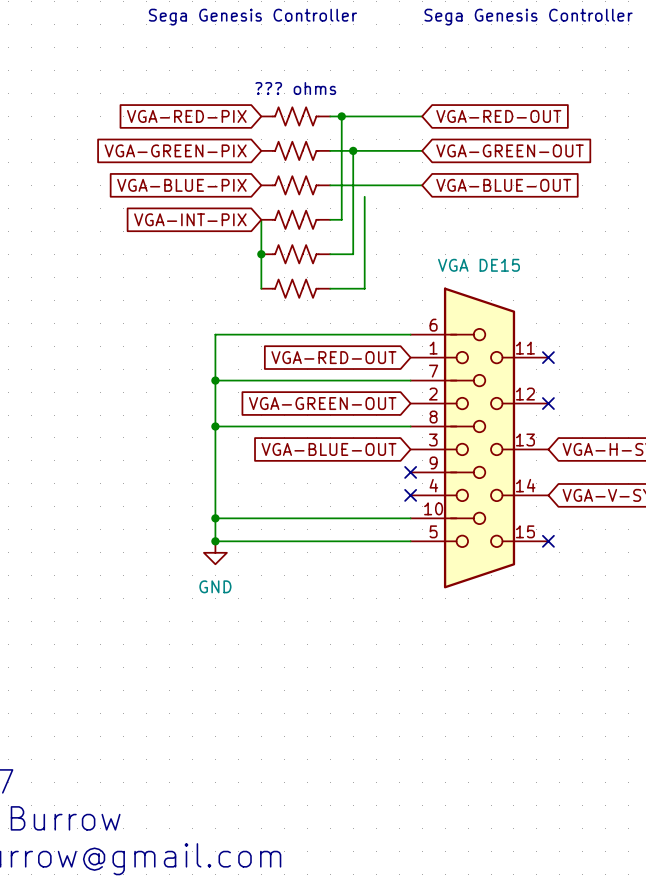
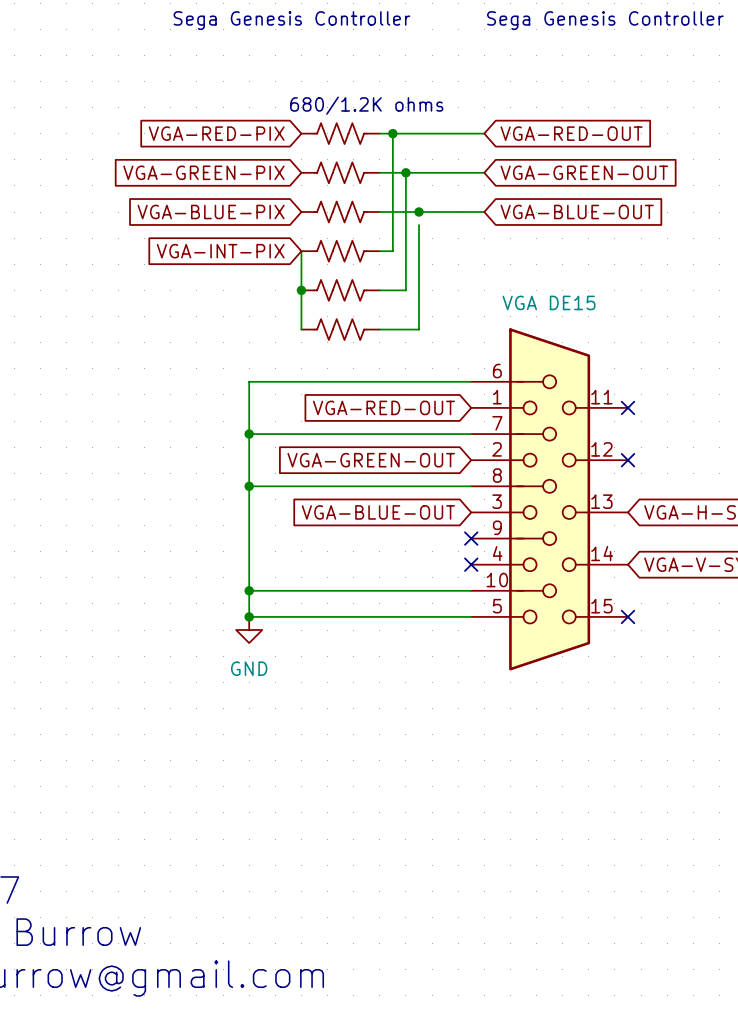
text: ??? ohms (295, 88) -> none
text: none -> 680/1.2K ohms (366, 105)
junction: none -> (419, 212)

